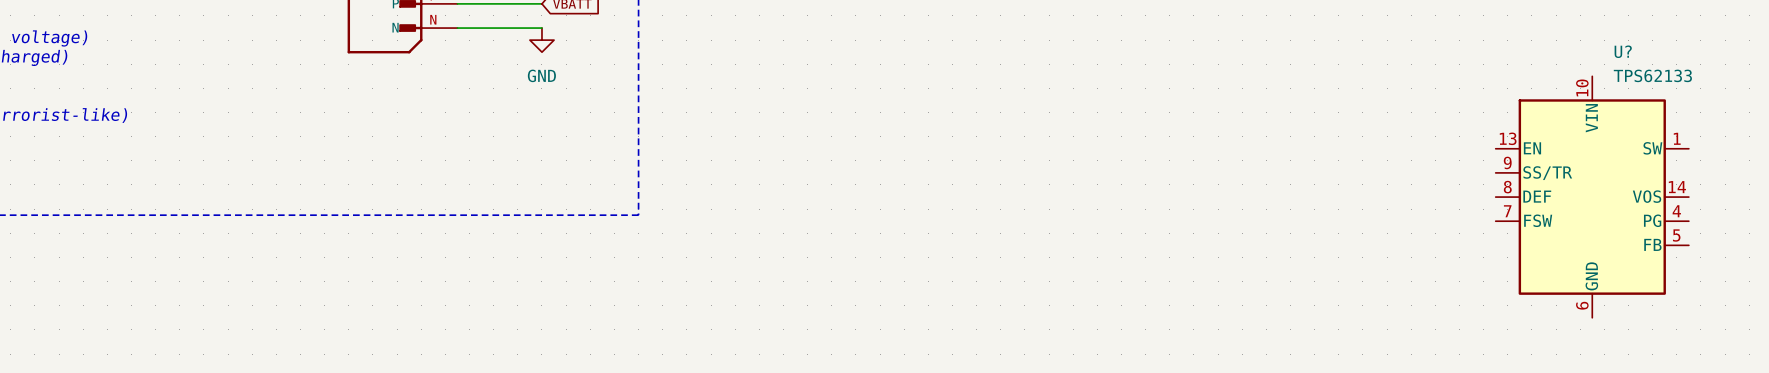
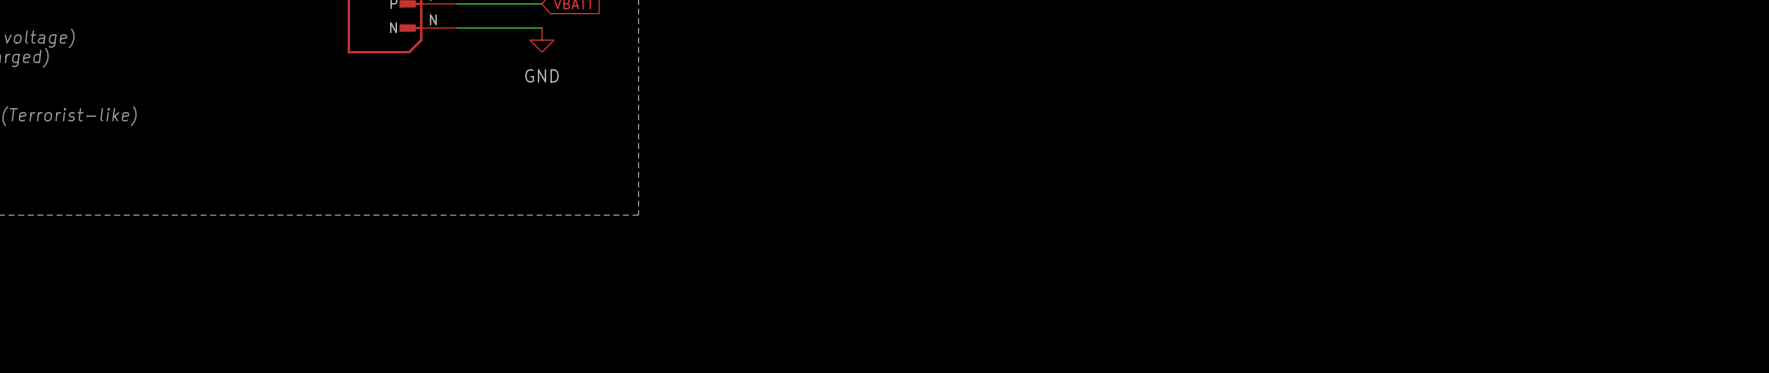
U?: TPS62133 (1592, 197) -> none

